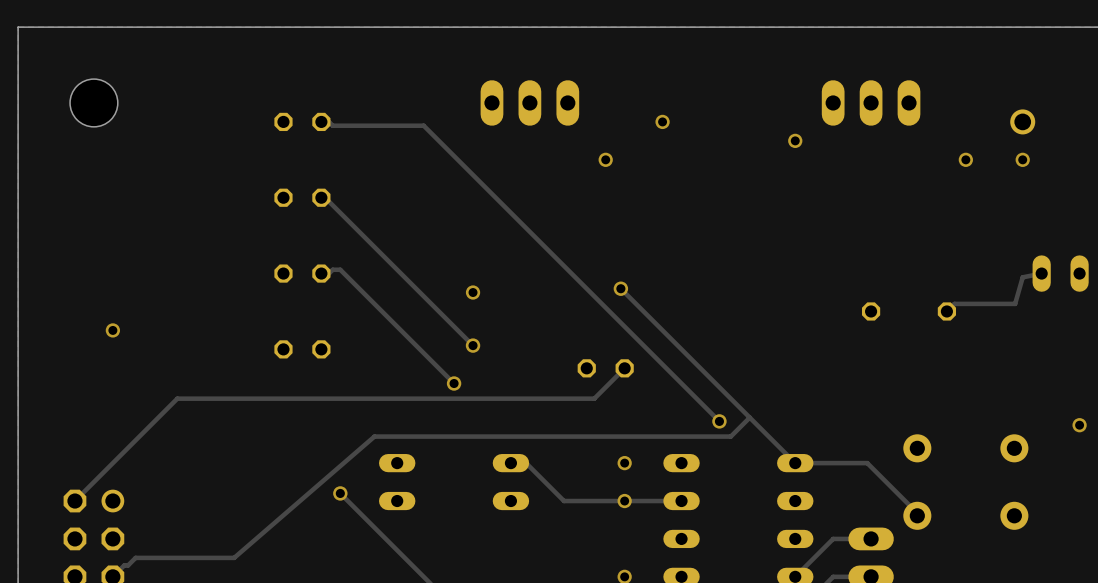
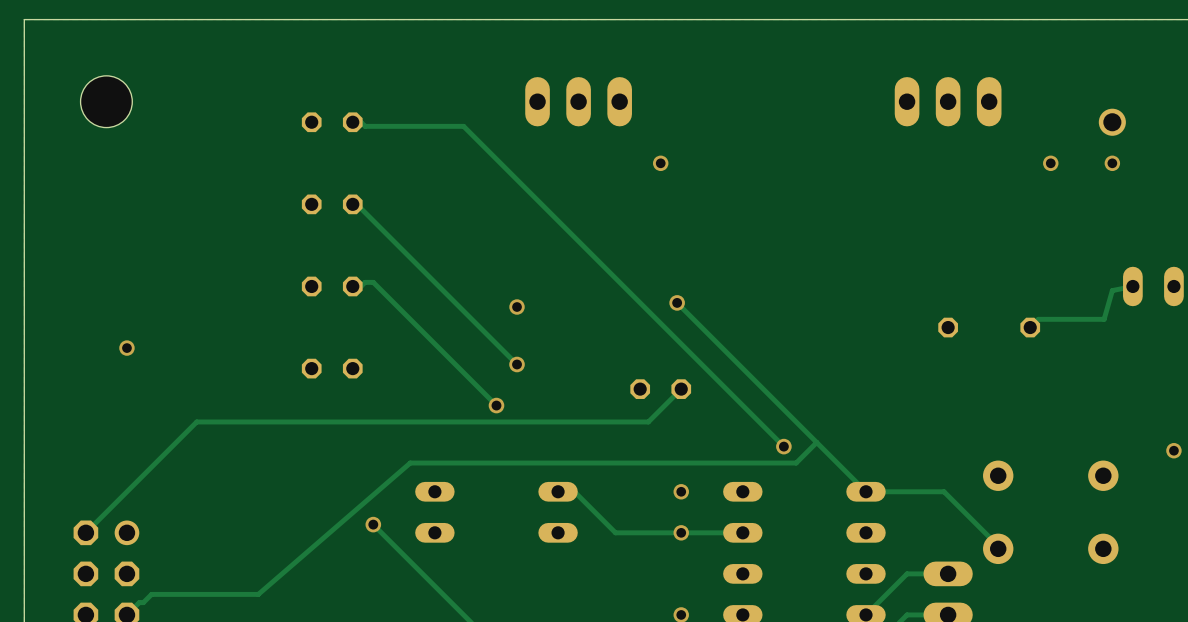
via: (662, 121) -> none
via: (795, 140) -> none

